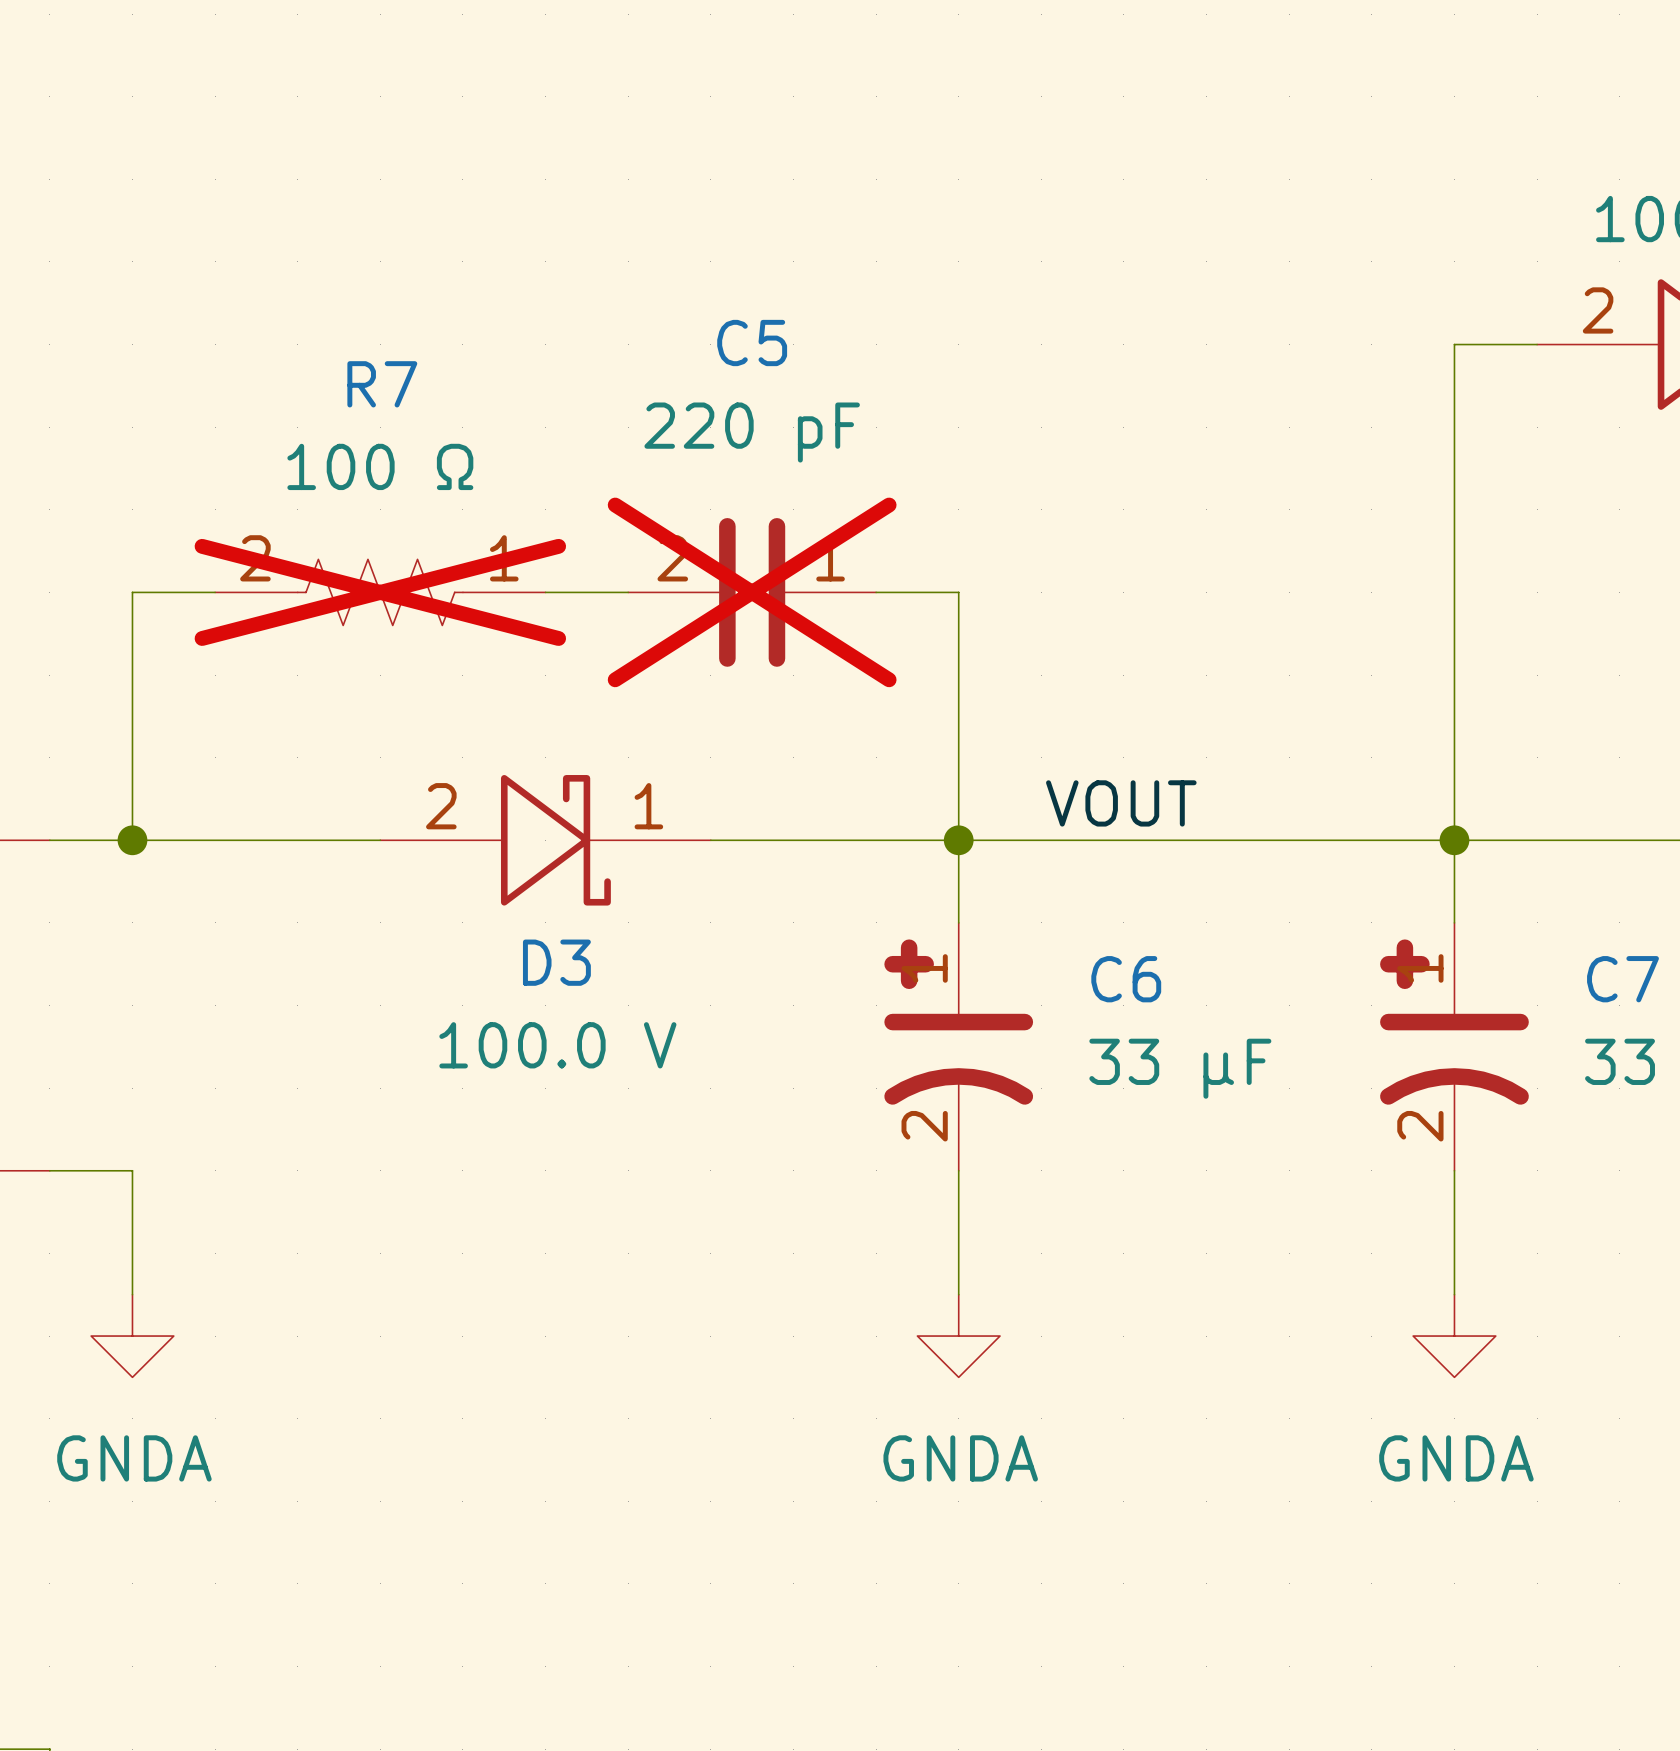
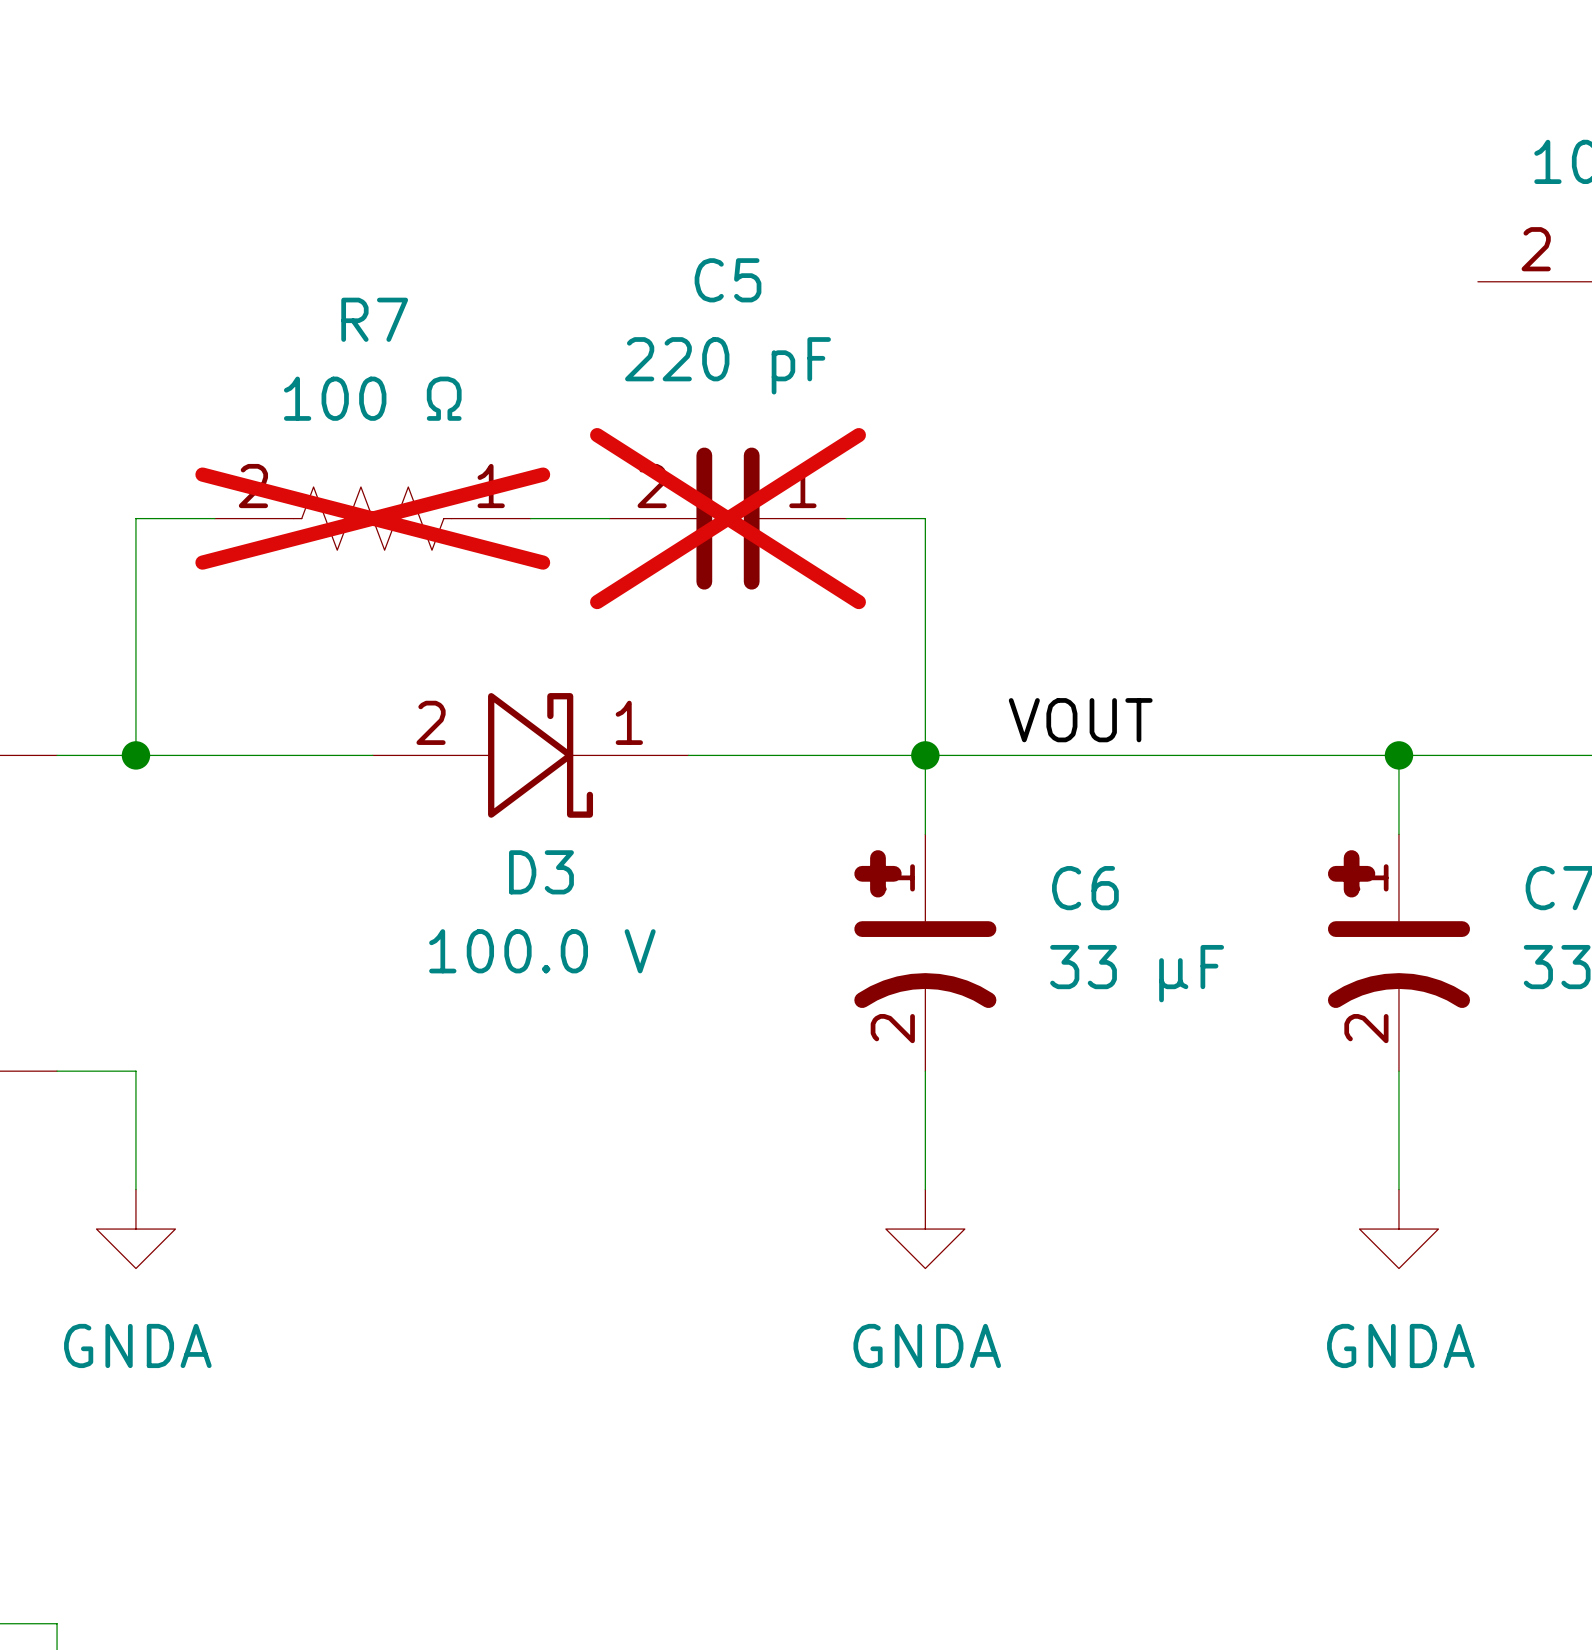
wire: (1537, 344) (1454, 344) (1454, 840) -> none

